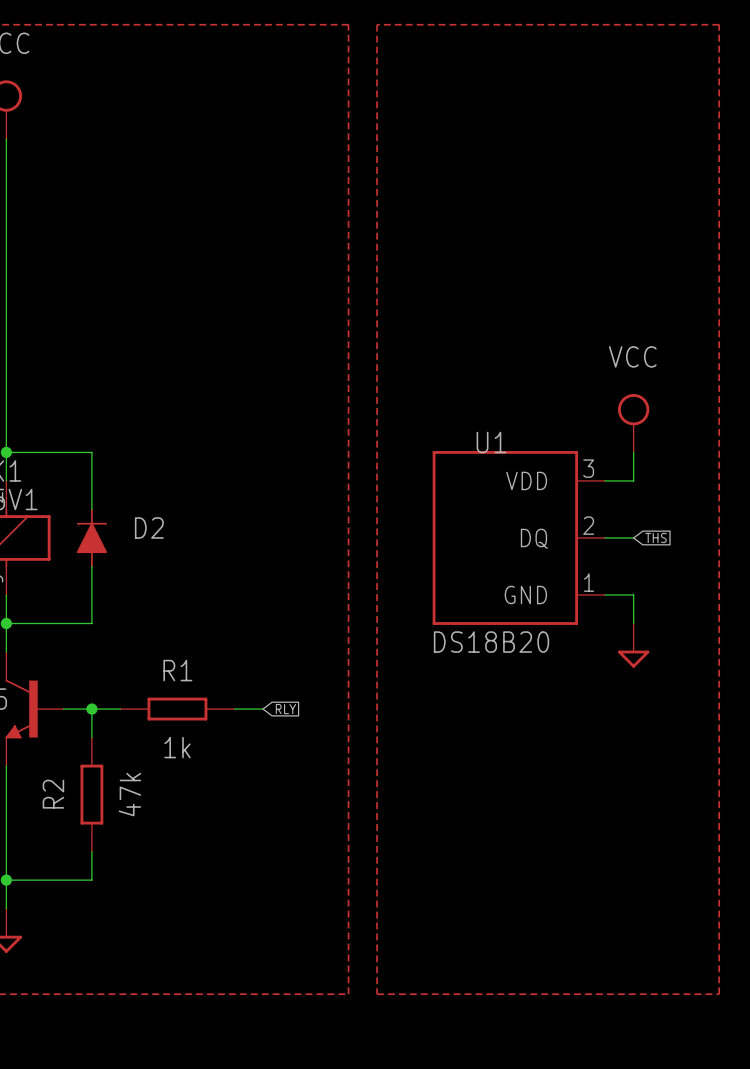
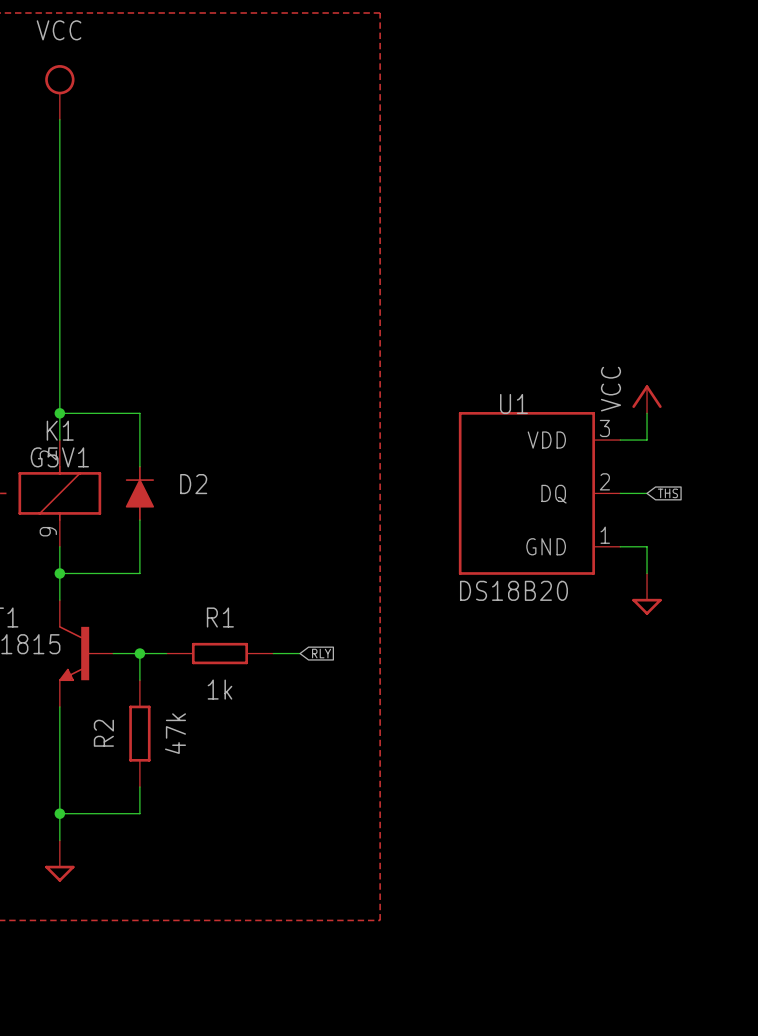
line: (377, 24) (377, 994) (719, 994) (719, 24) (377, 24) -> none
power symbol: VCC (633, 423) -> none
power symbol: none -> VCC (647, 399)

